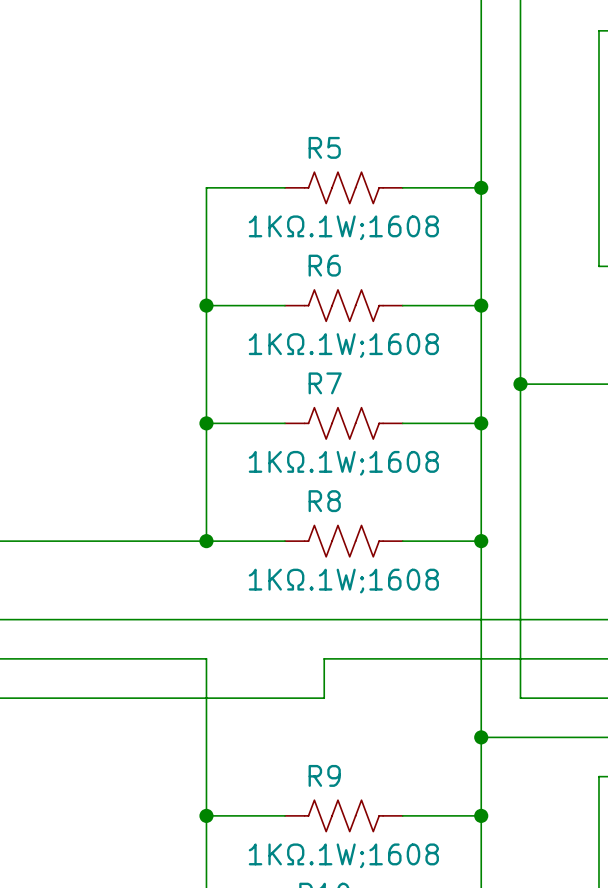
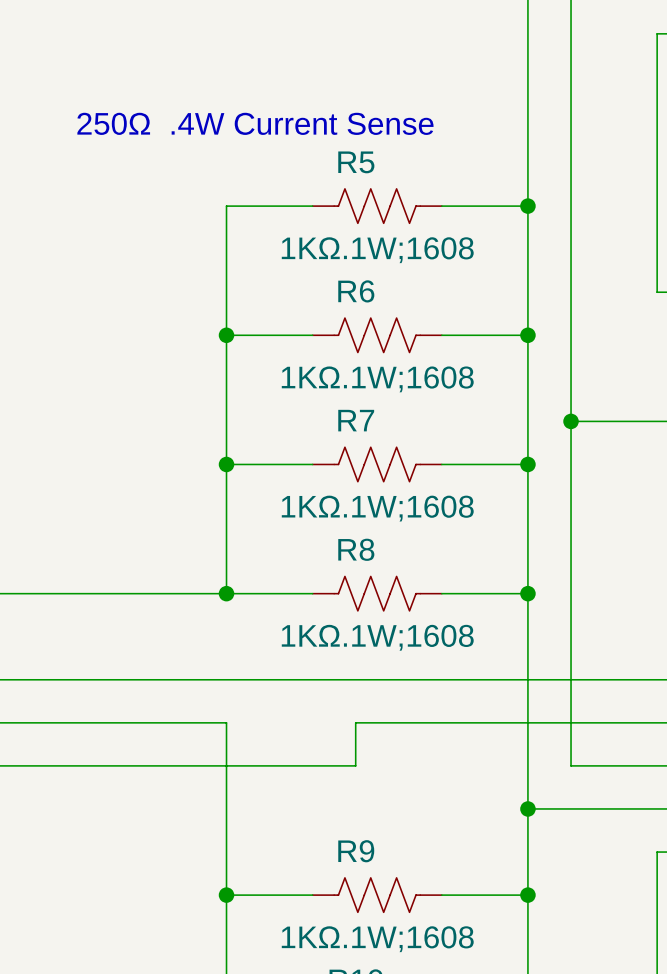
text: none -> 250Ω .4W Current Sense (255, 123)

